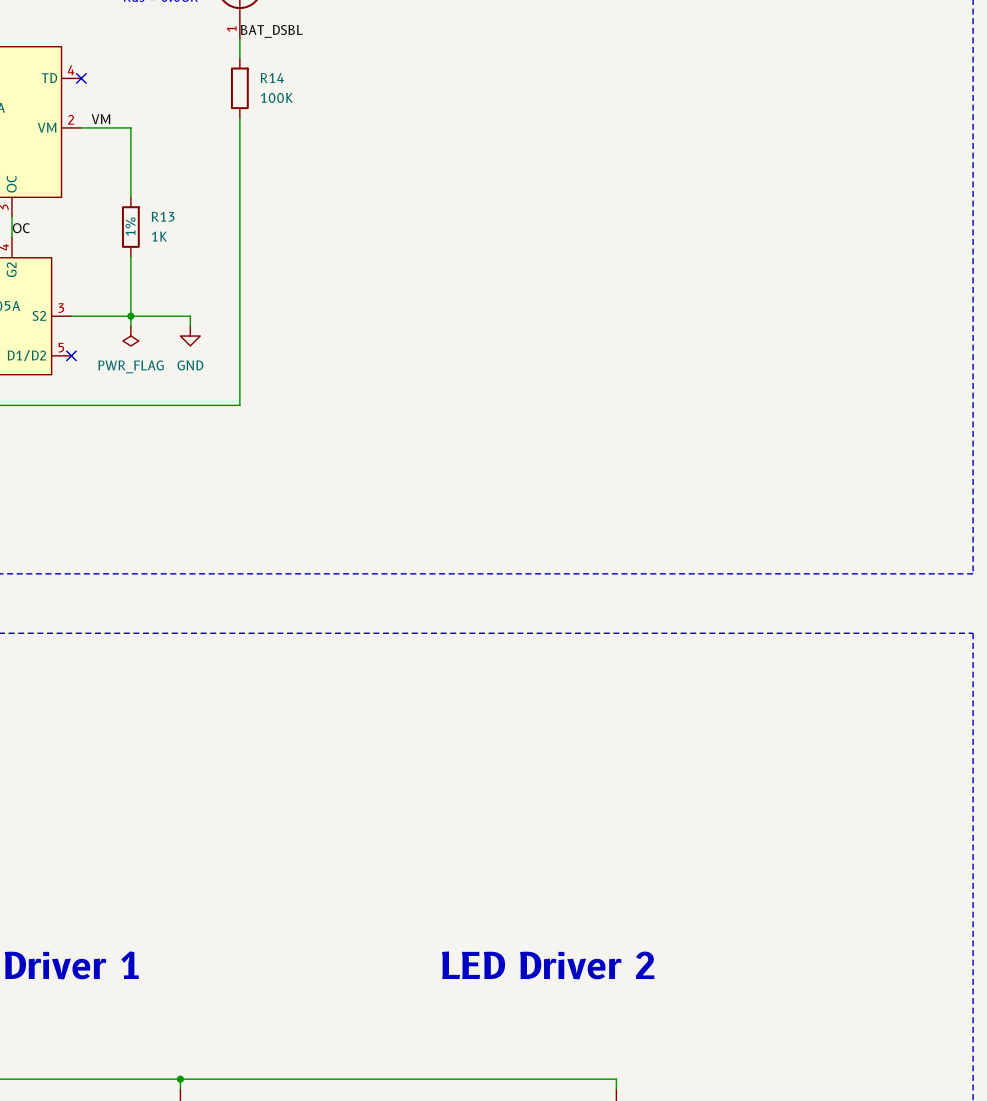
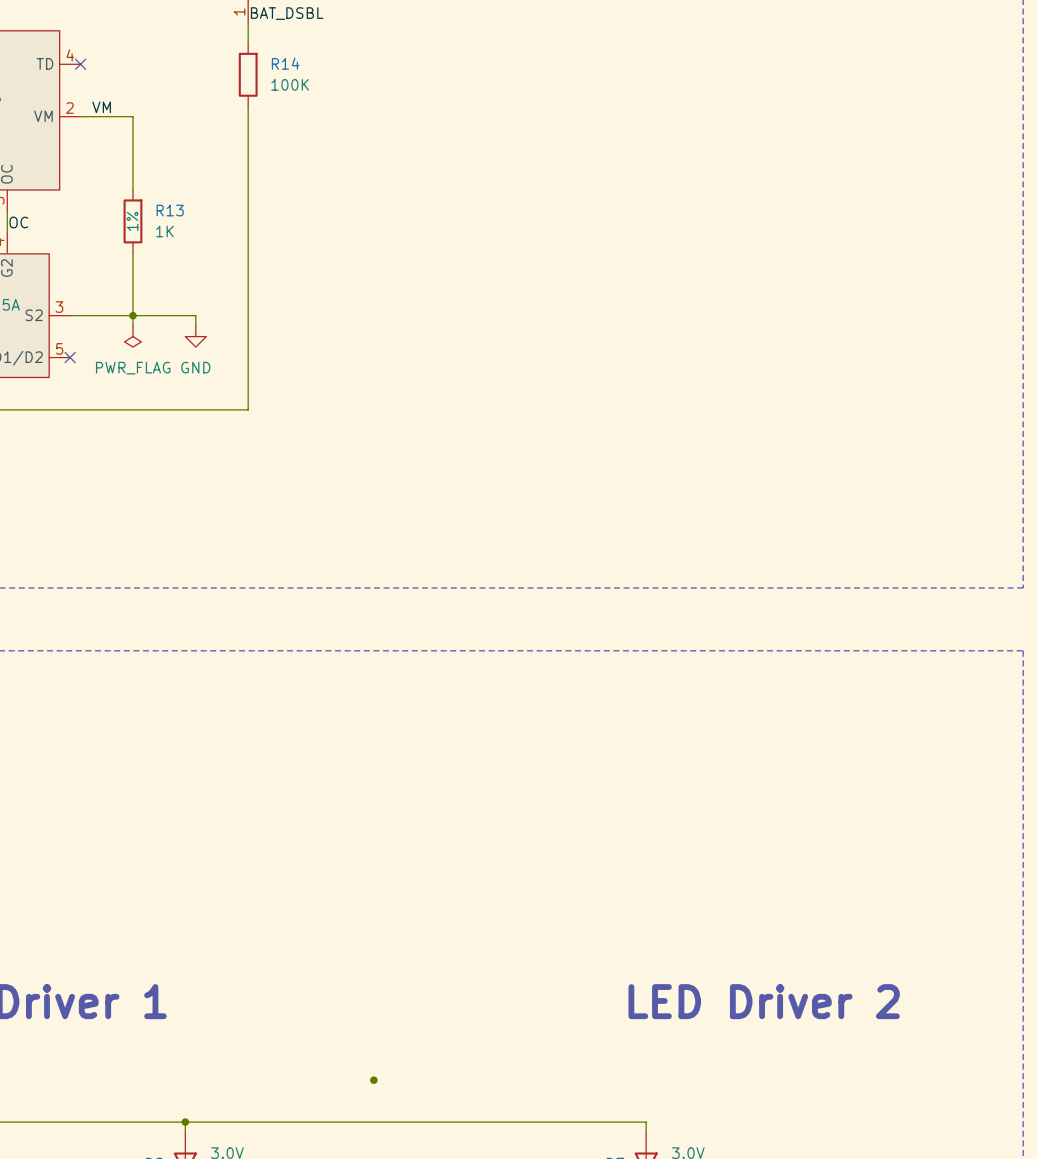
text position: LED Driver 2 (548, 965) -> LED Driver 2 (764, 1001)
junction: none -> (373, 1080)

